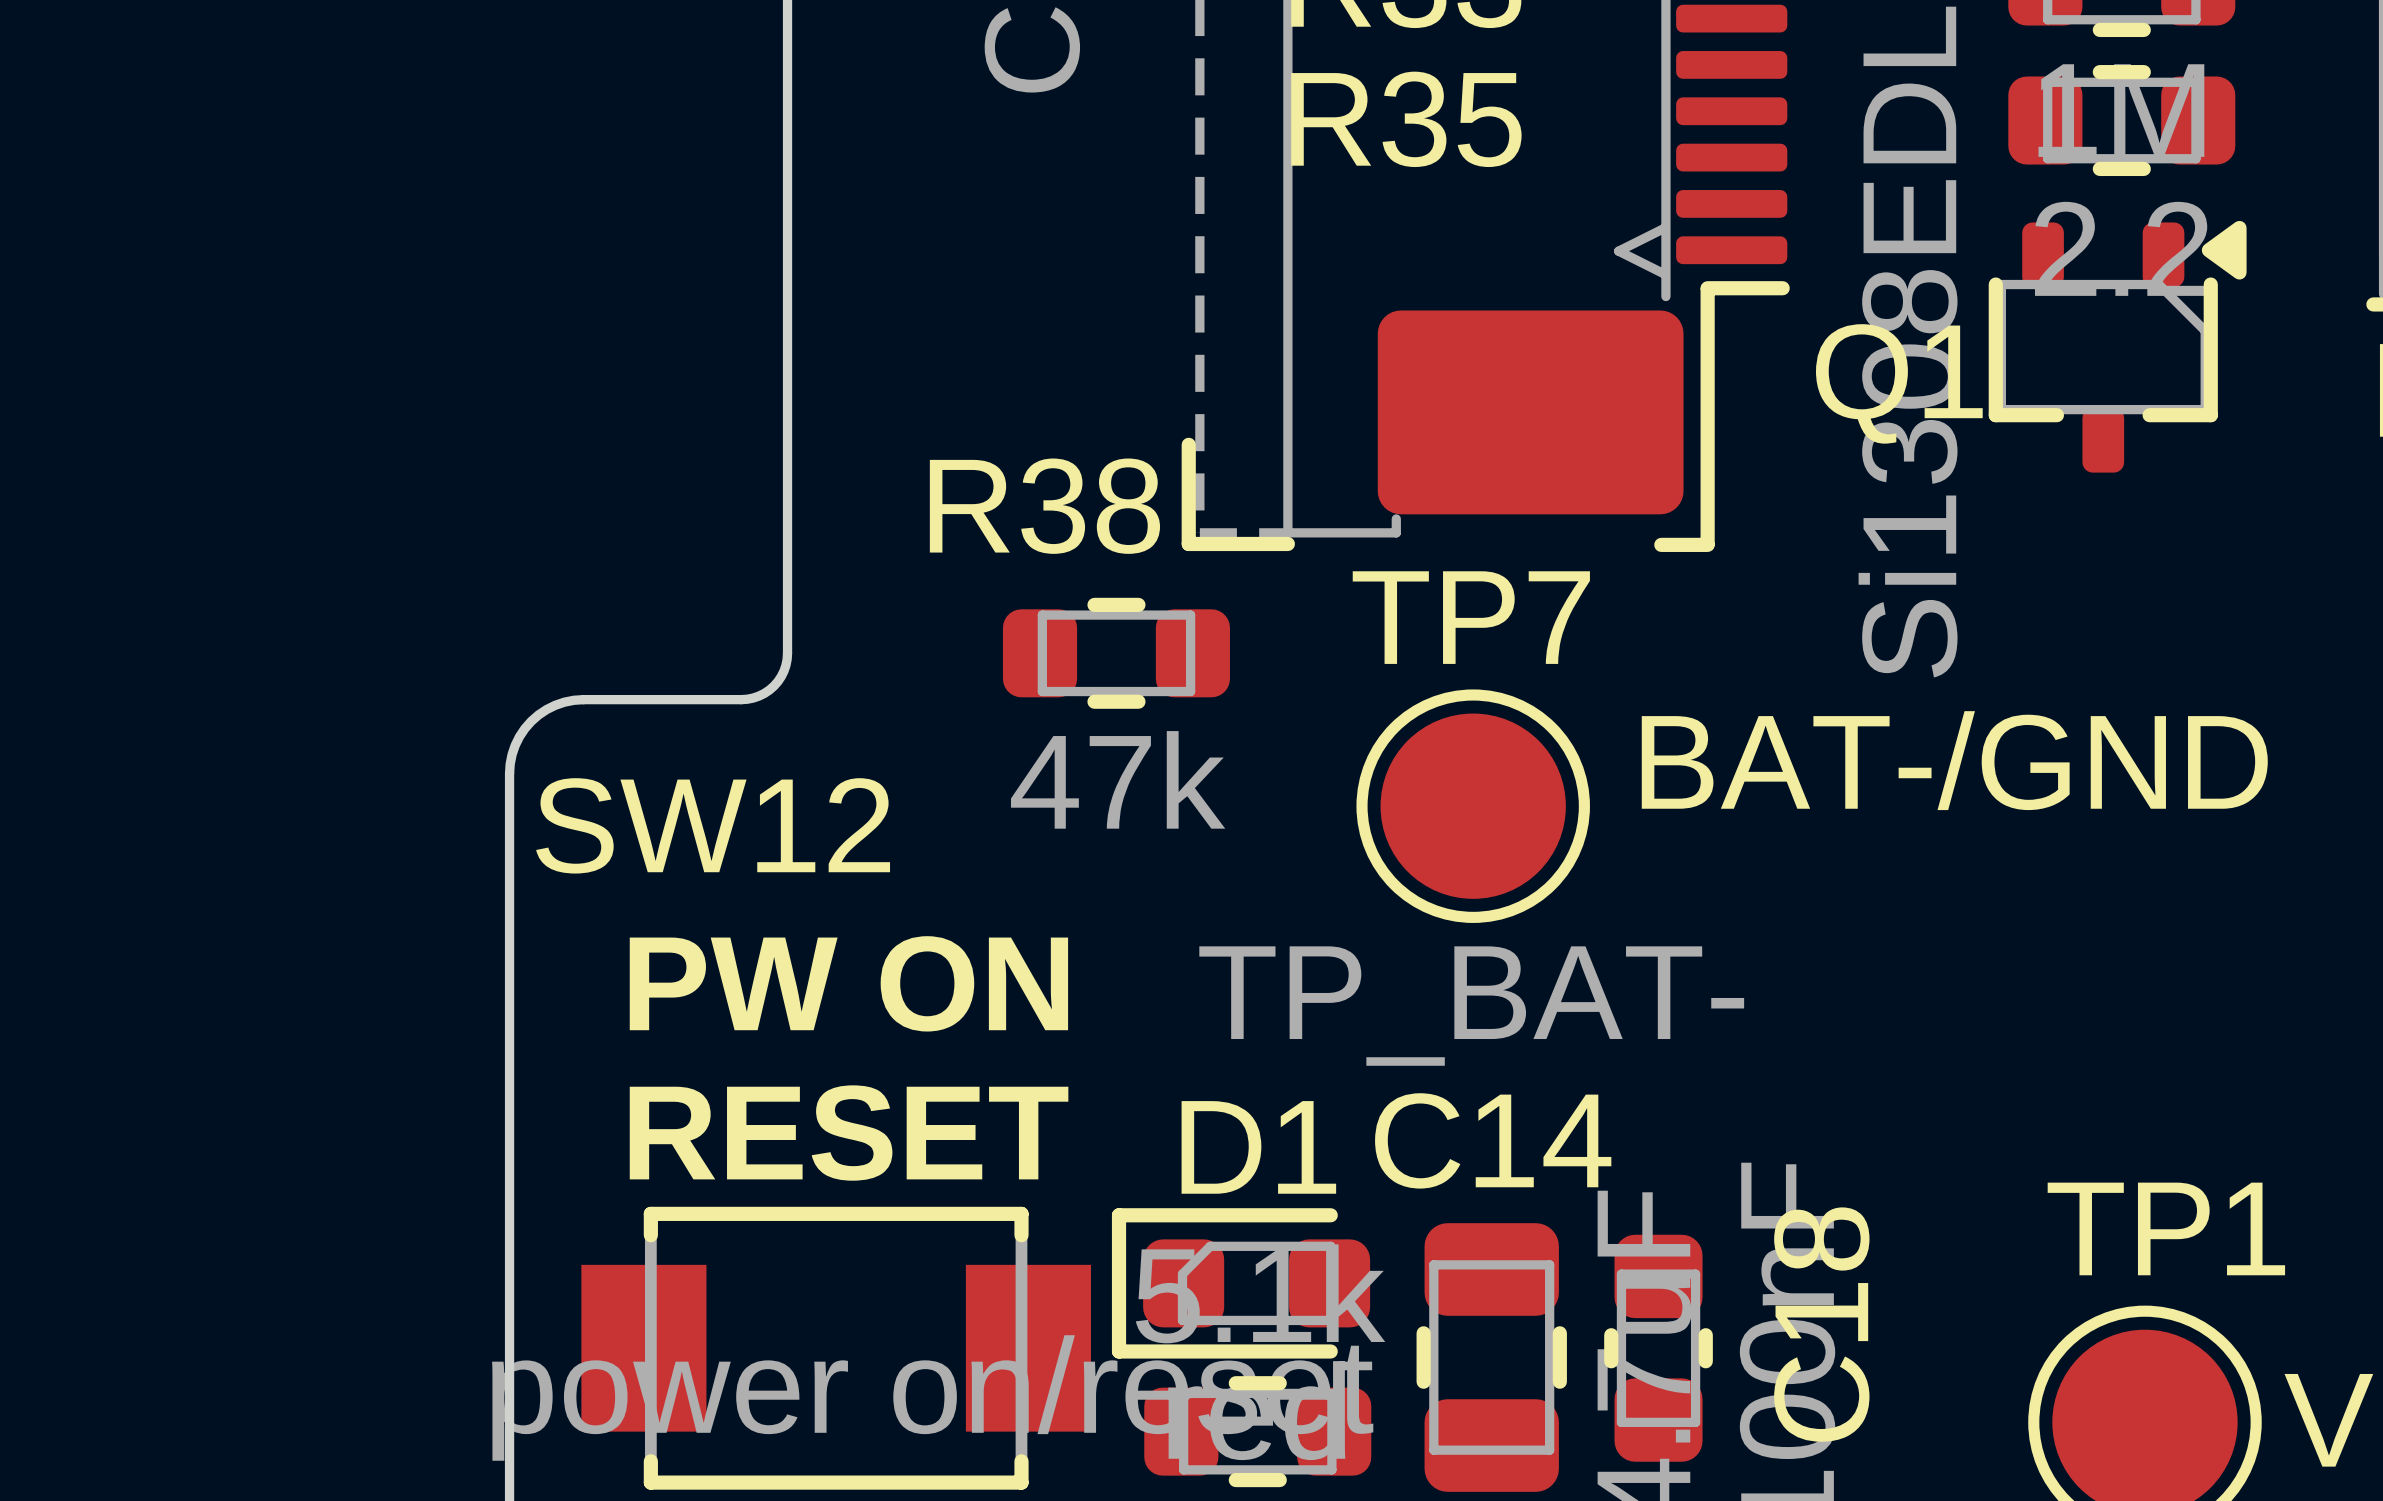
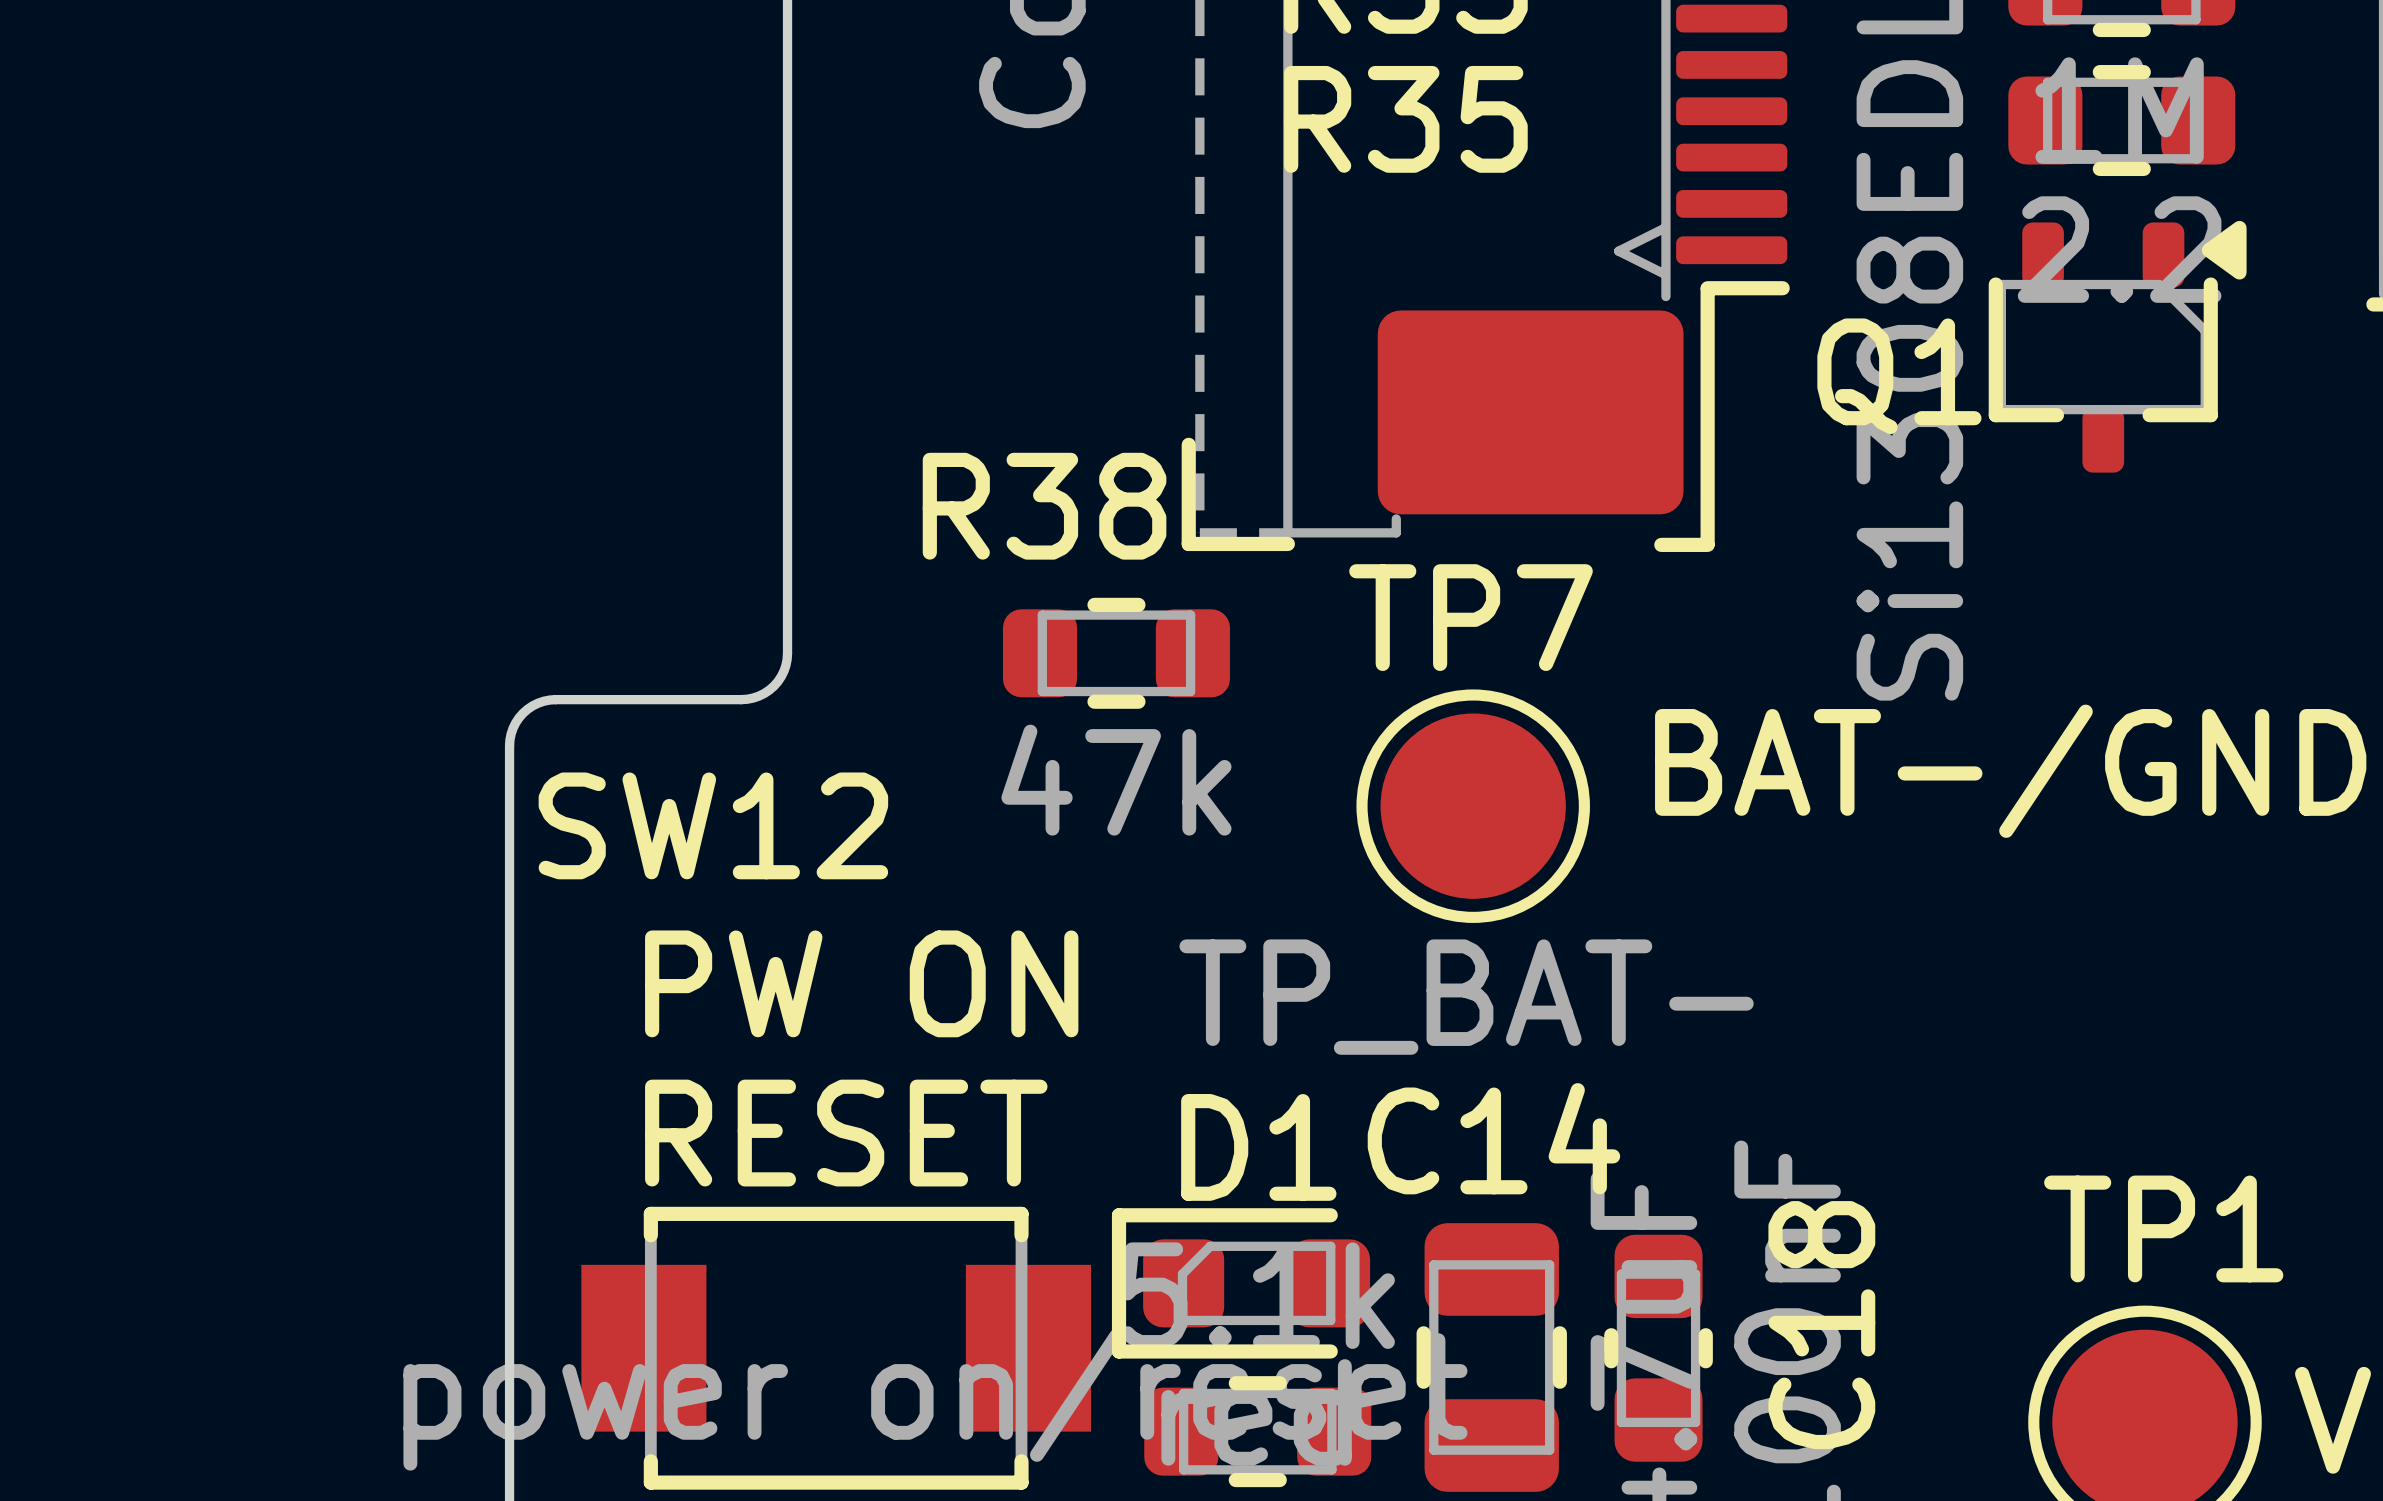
board edge: (583, 699) (555, 705) (531, 721) (515, 745) (509, 773) -> (583, 699) (543, 701) (532, 705) (523, 713) (515, 722) (511, 733) (509, 773)

